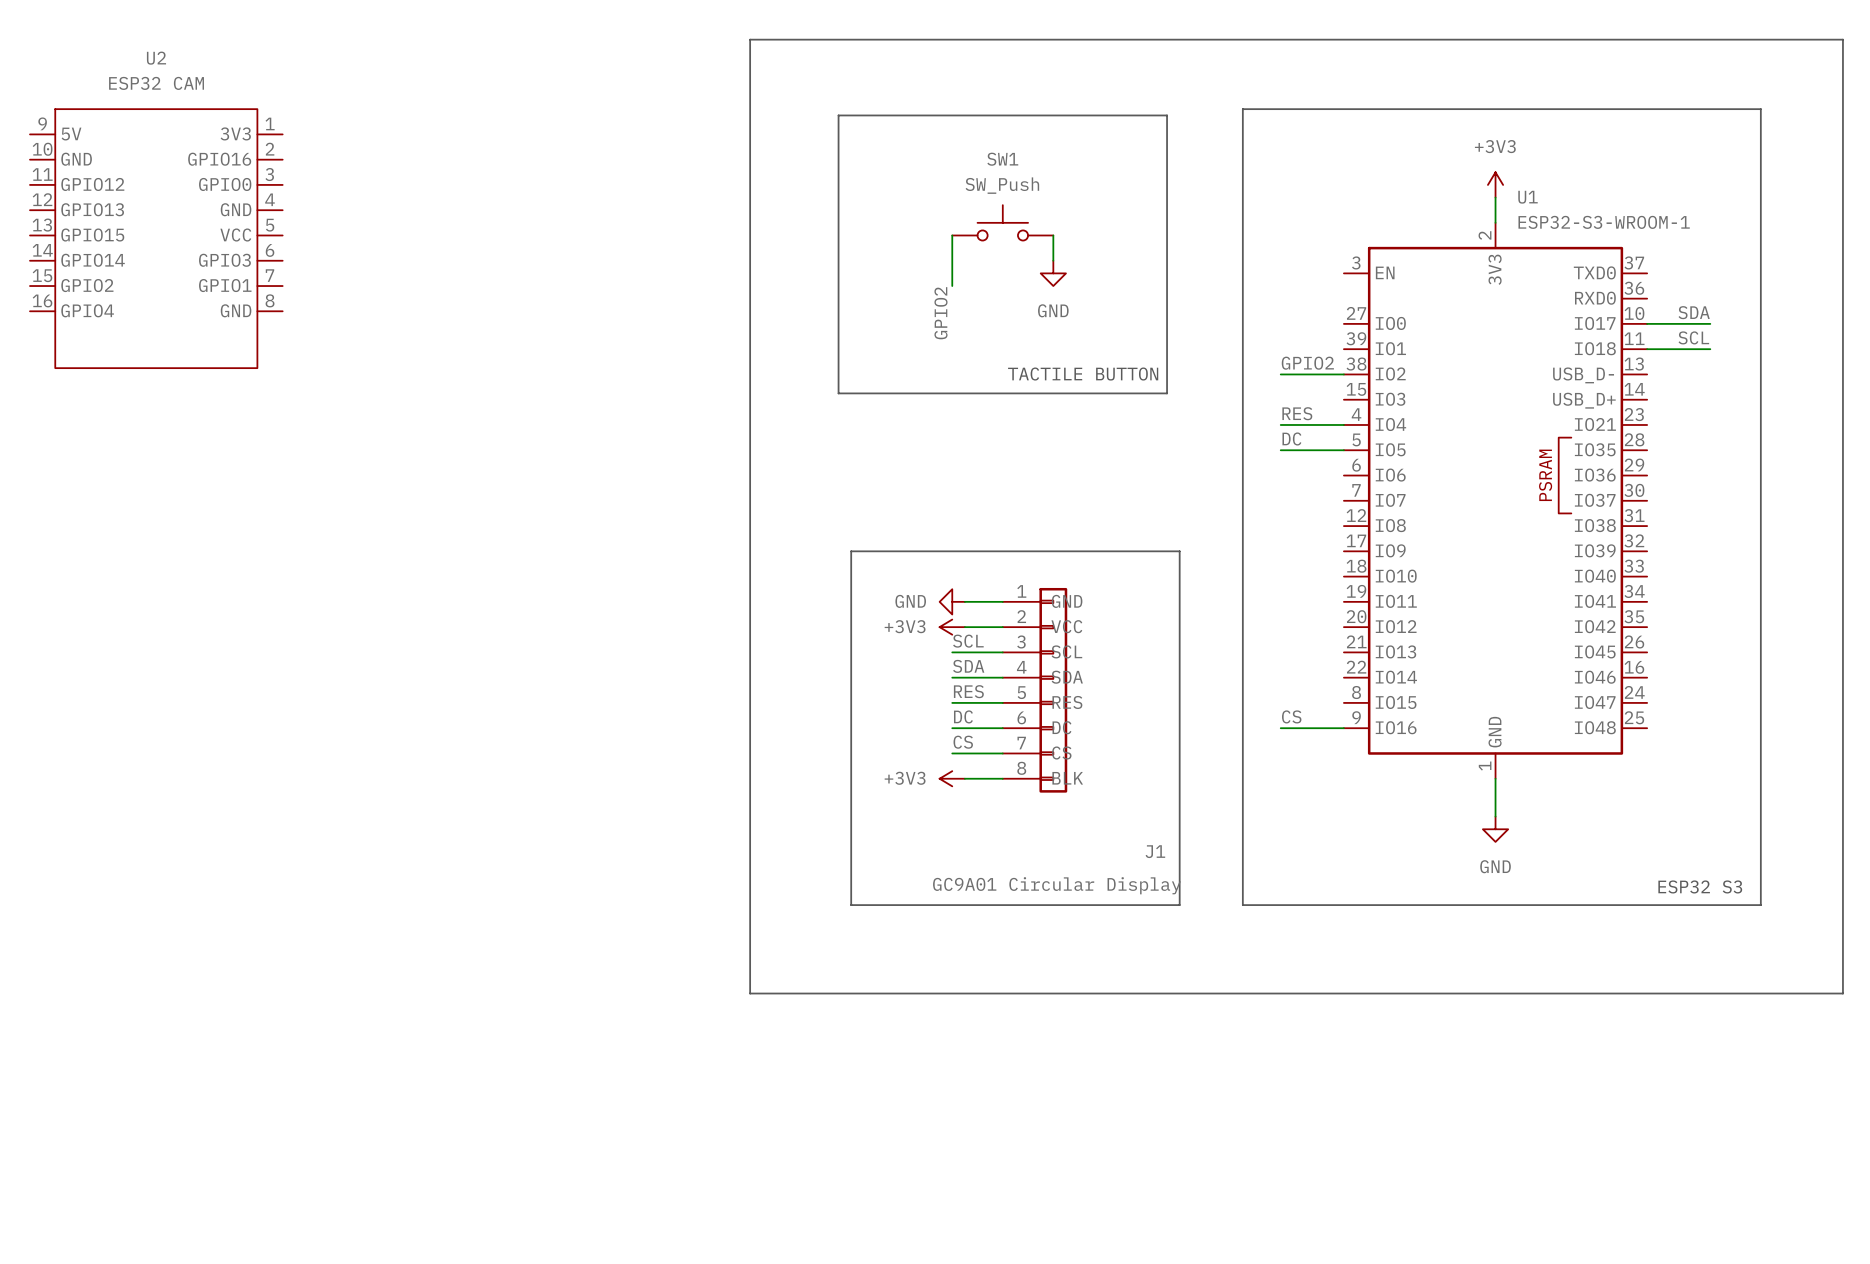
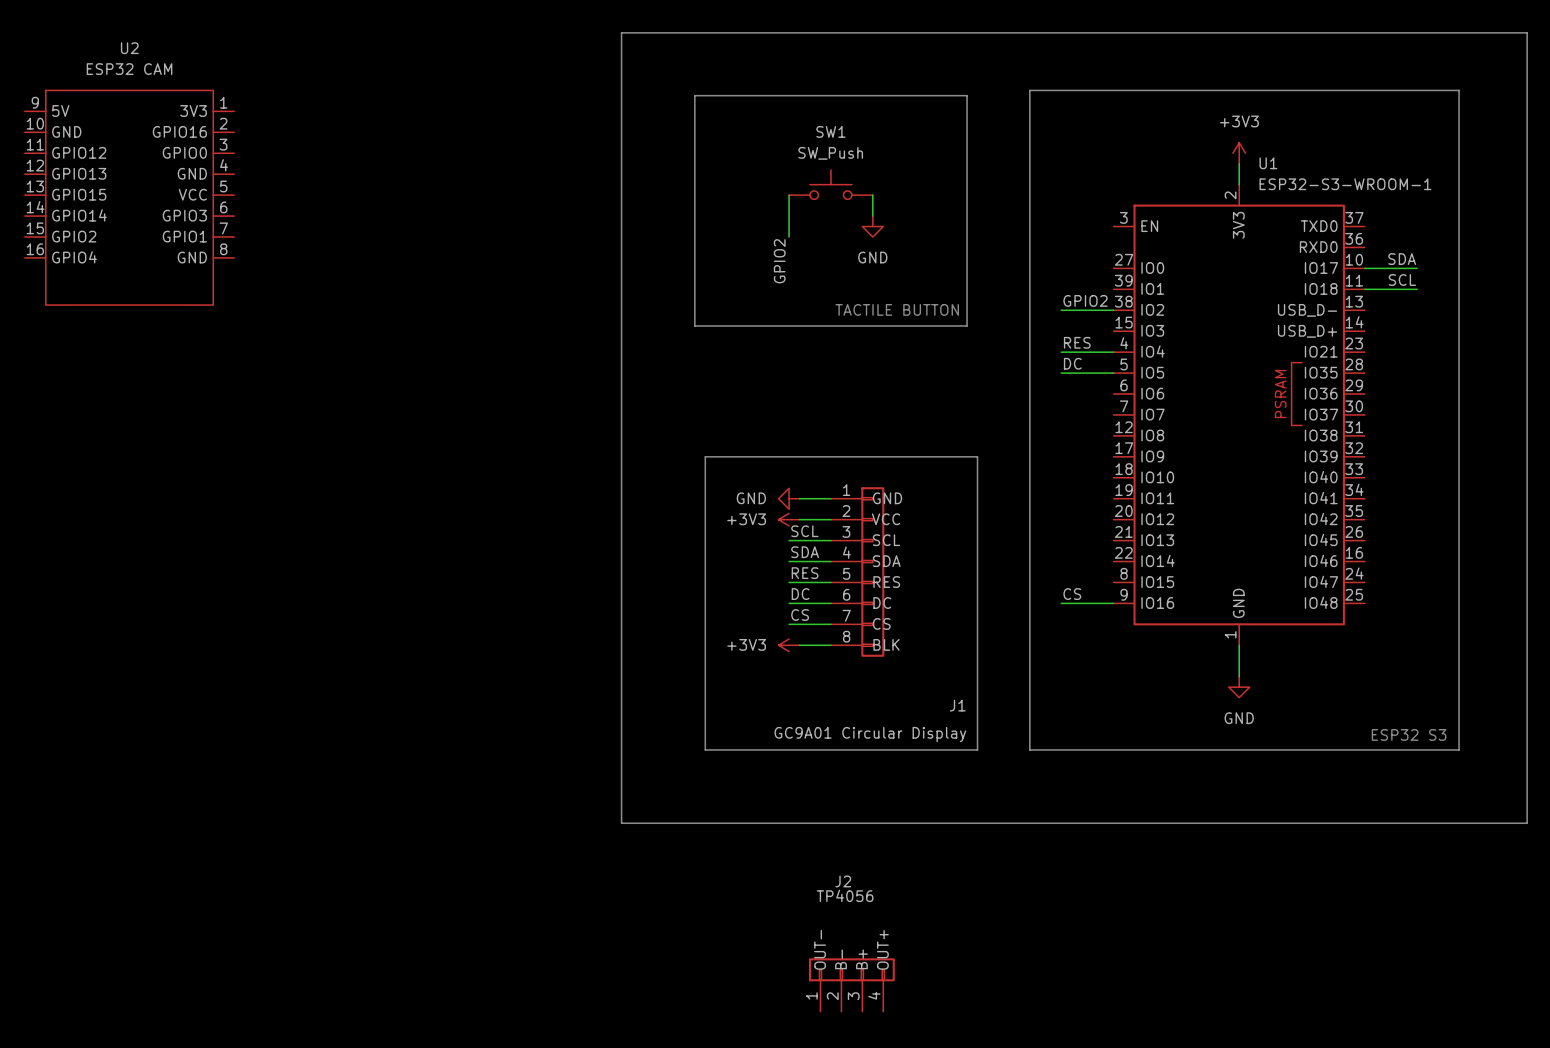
J2: none -> TP4056 (851, 984)

